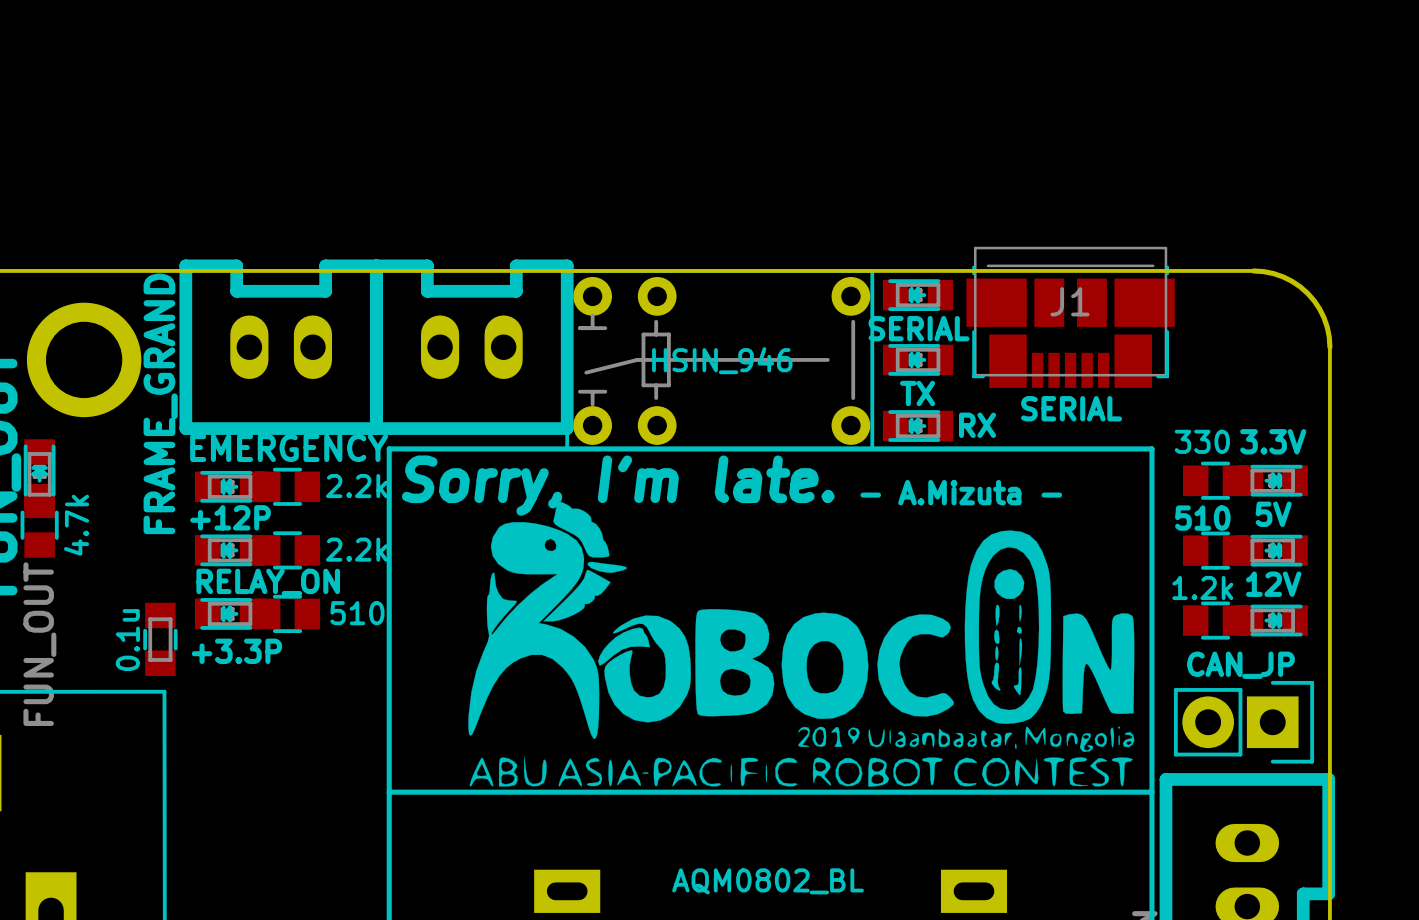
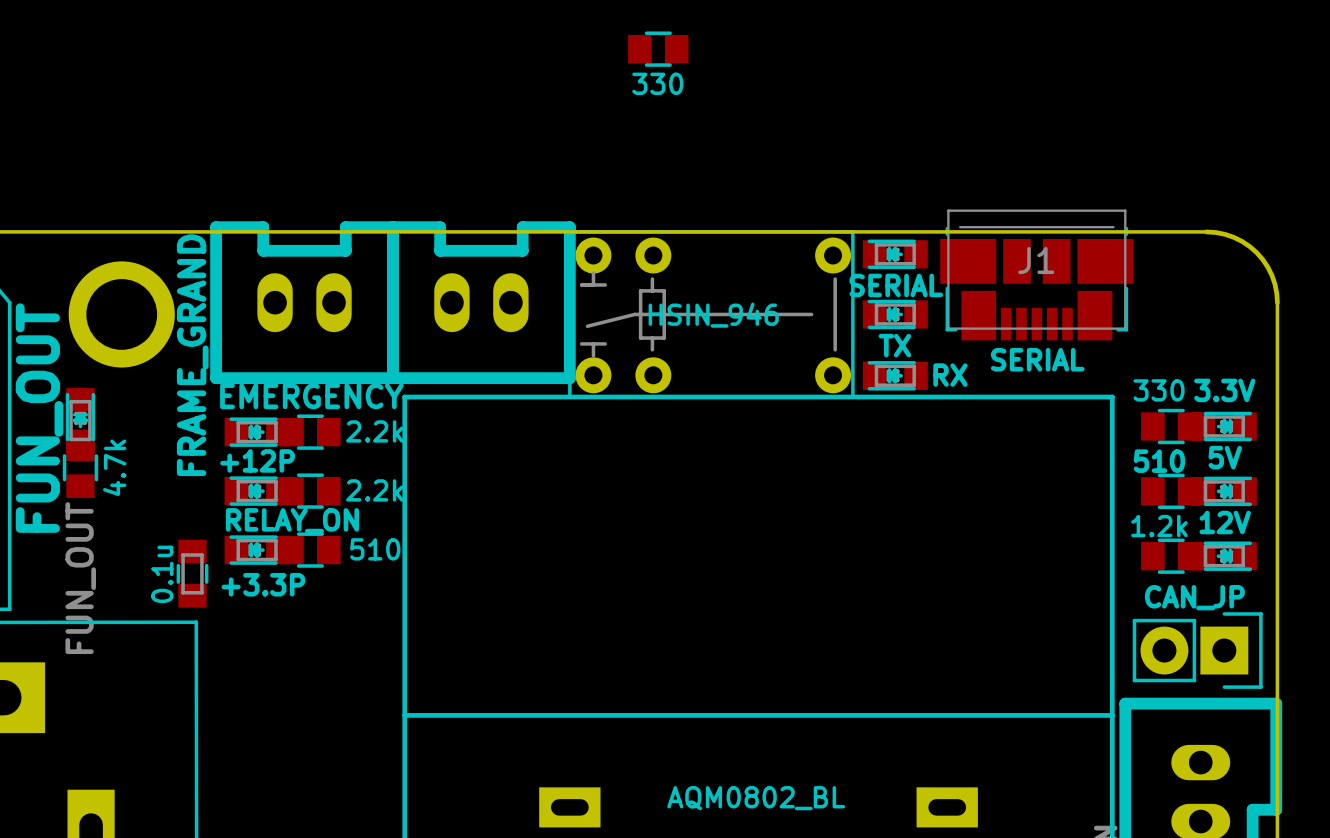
part: none -> 330 (658, 49)
text: Sorry, I'm late. (618, 485) -> none
text: - A.Mizuta - (961, 492) -> none
drawing: [468, 501, 1135, 787] -> none

